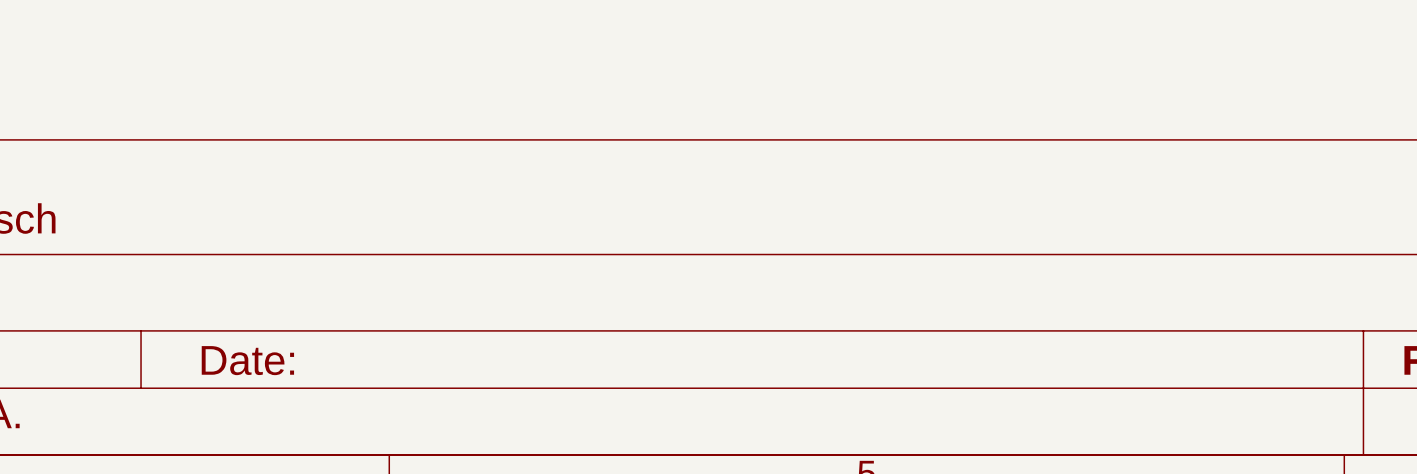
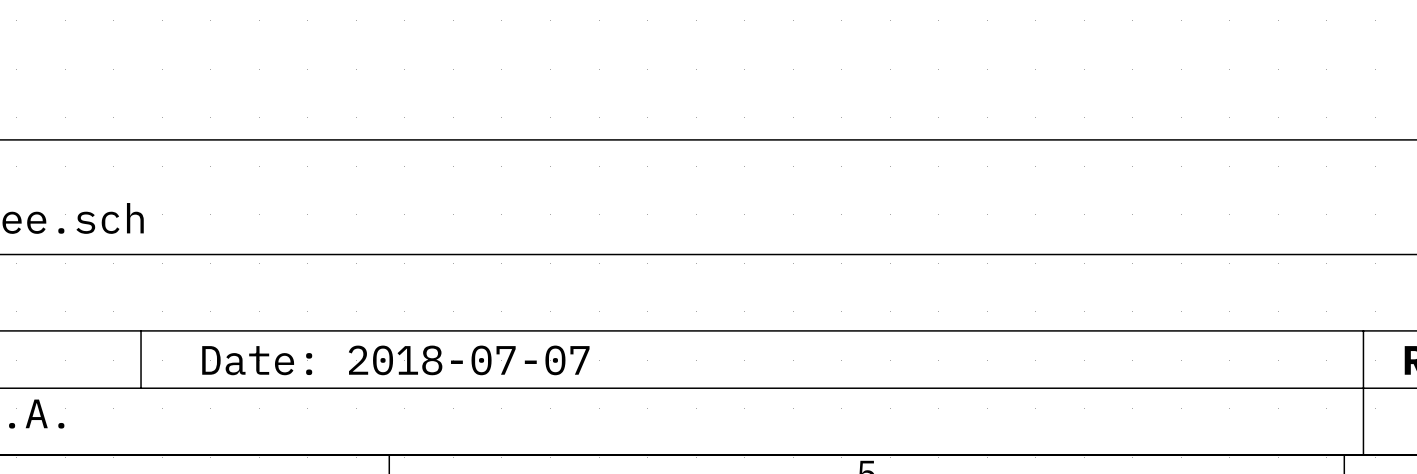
title block: Date: (247, 360) -> Date: 2018-07-07 (395, 360)

